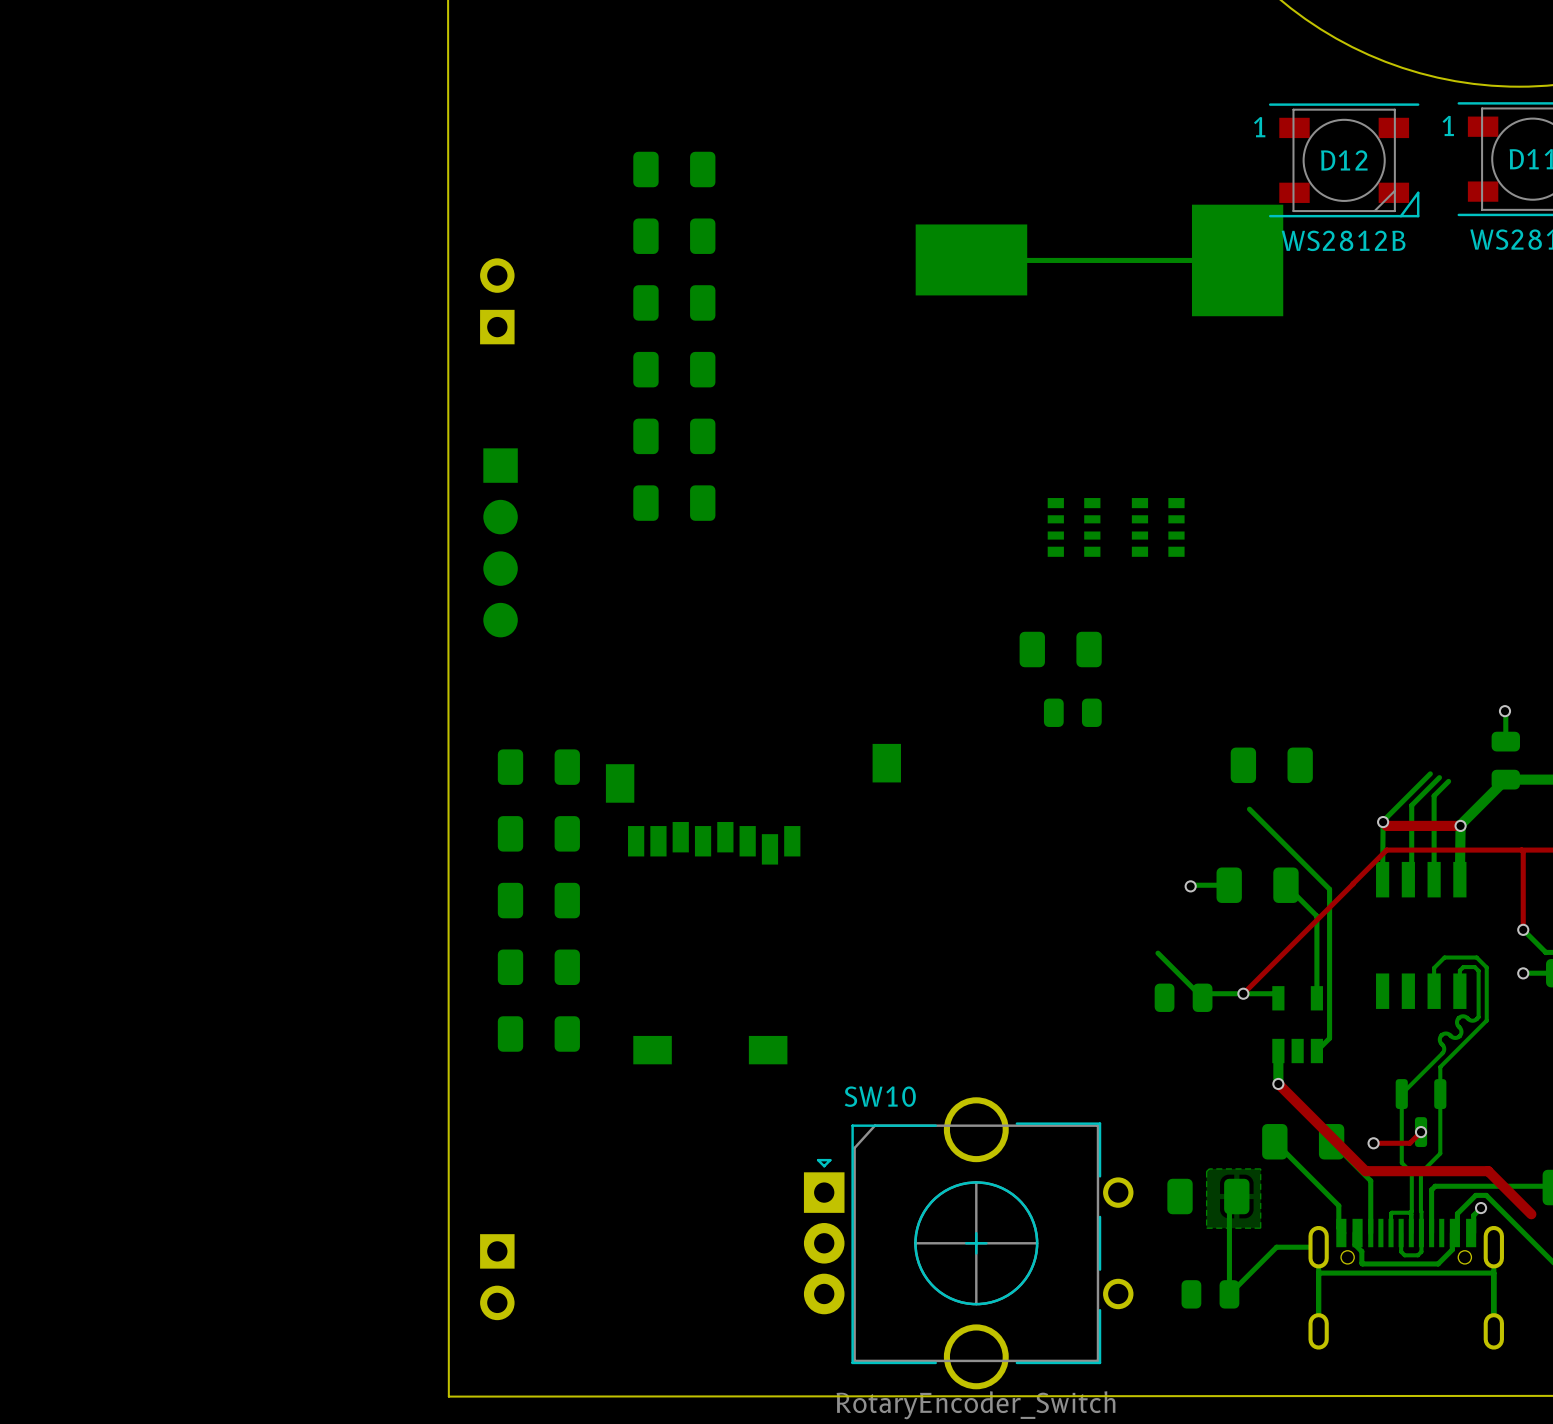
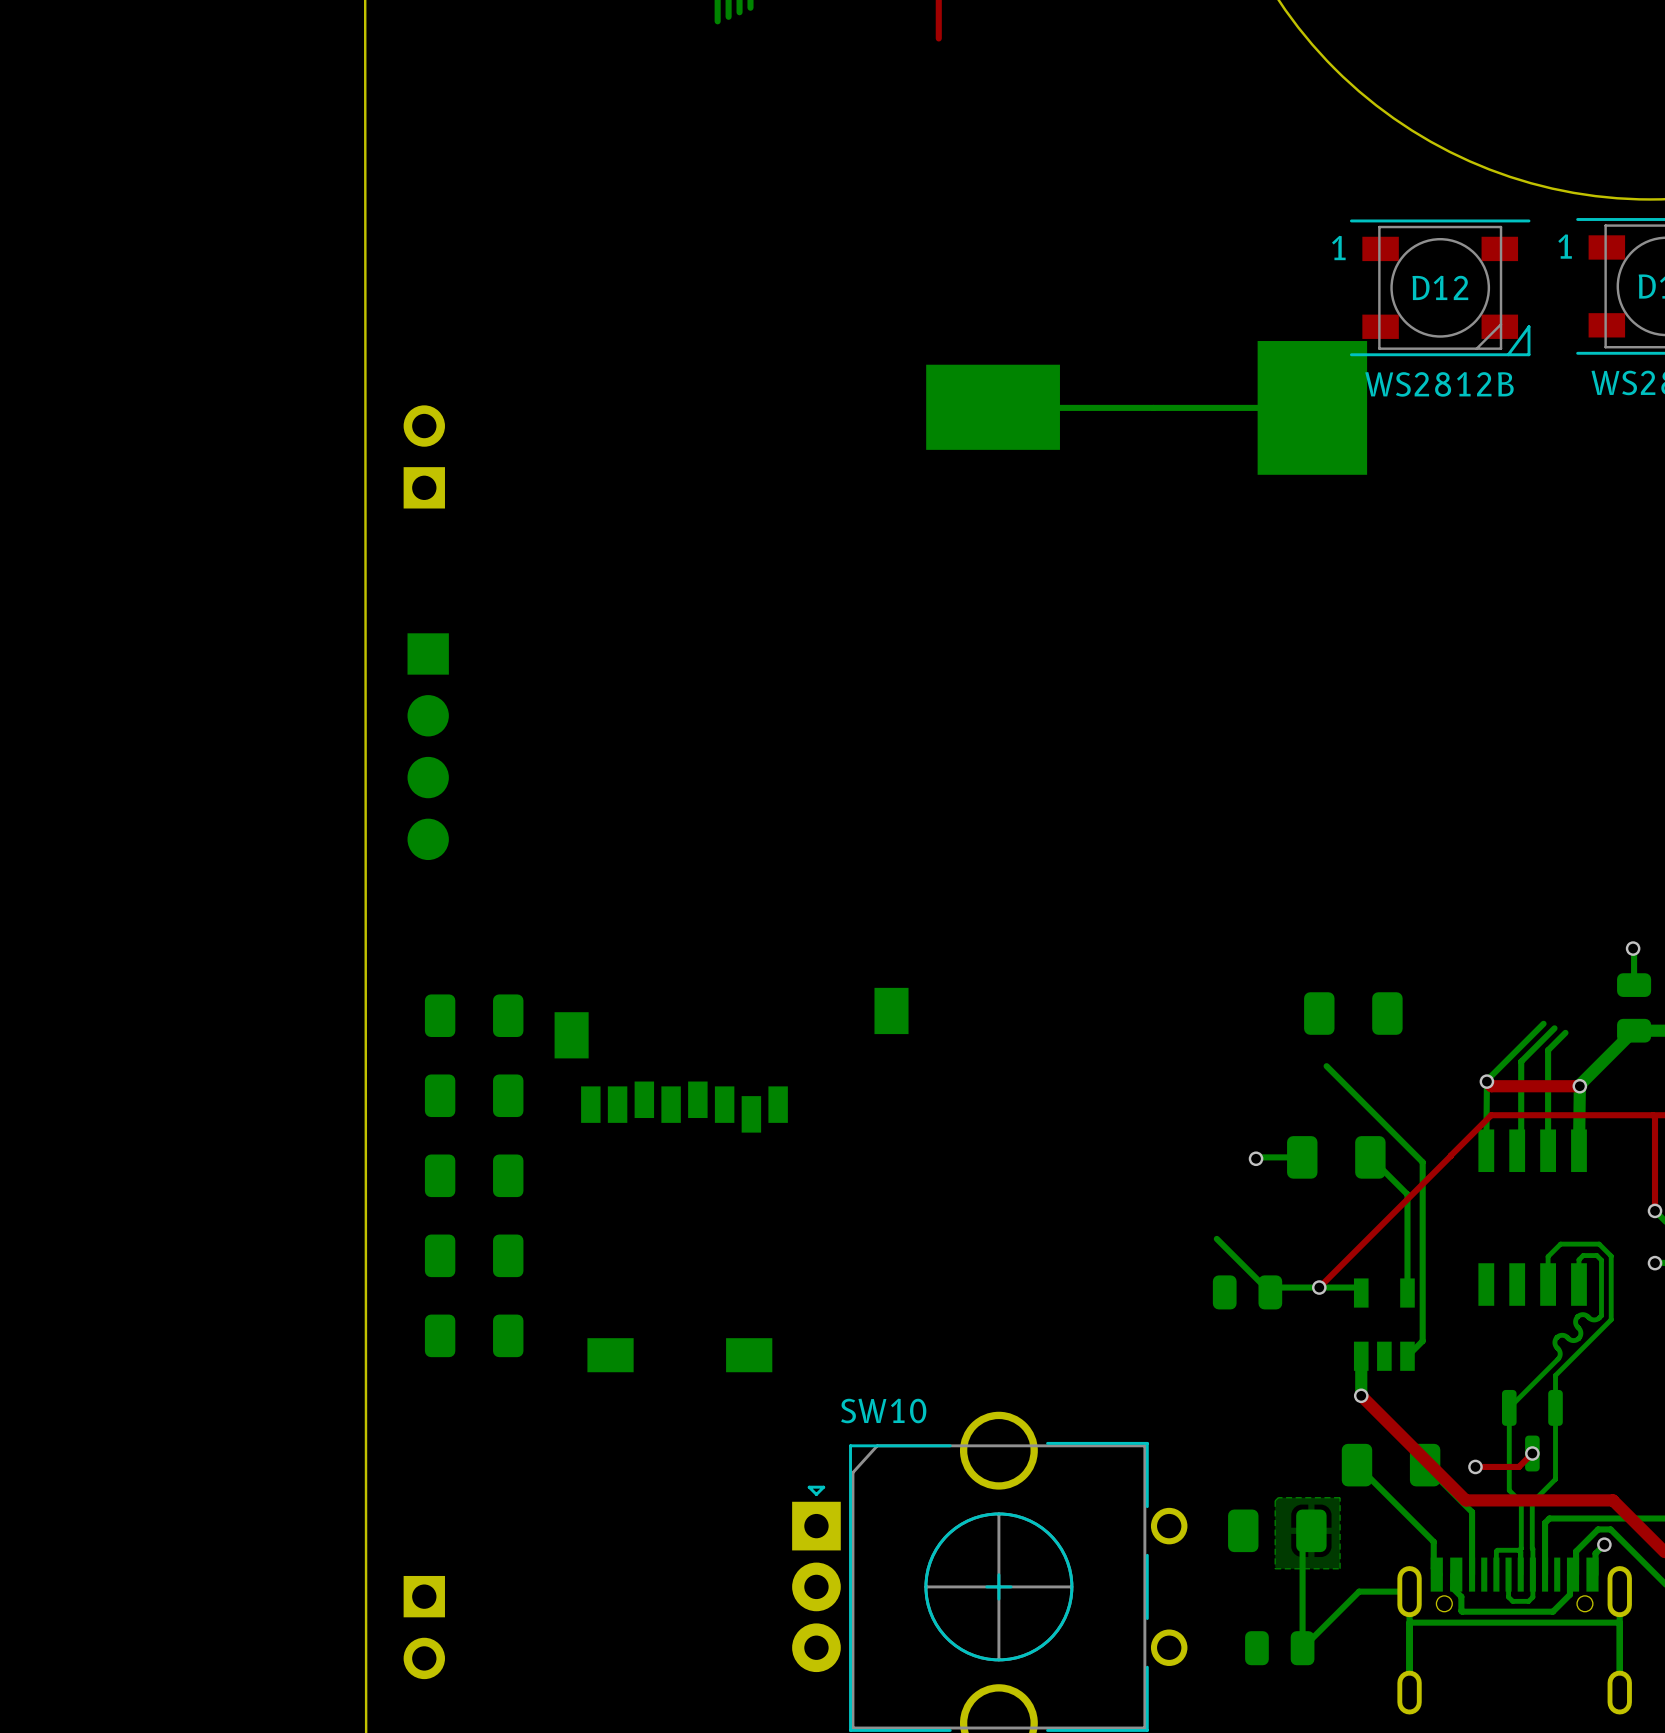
part: (674, 169) -> none
part: (674, 236) -> none
part: (674, 302) -> none
part: (674, 369) -> none
part: (674, 436) -> none
part: (674, 503) -> none
part: (1074, 527) -> none
part: (1158, 527) -> none
part: (1060, 649) -> none
part: (1072, 712) -> none

